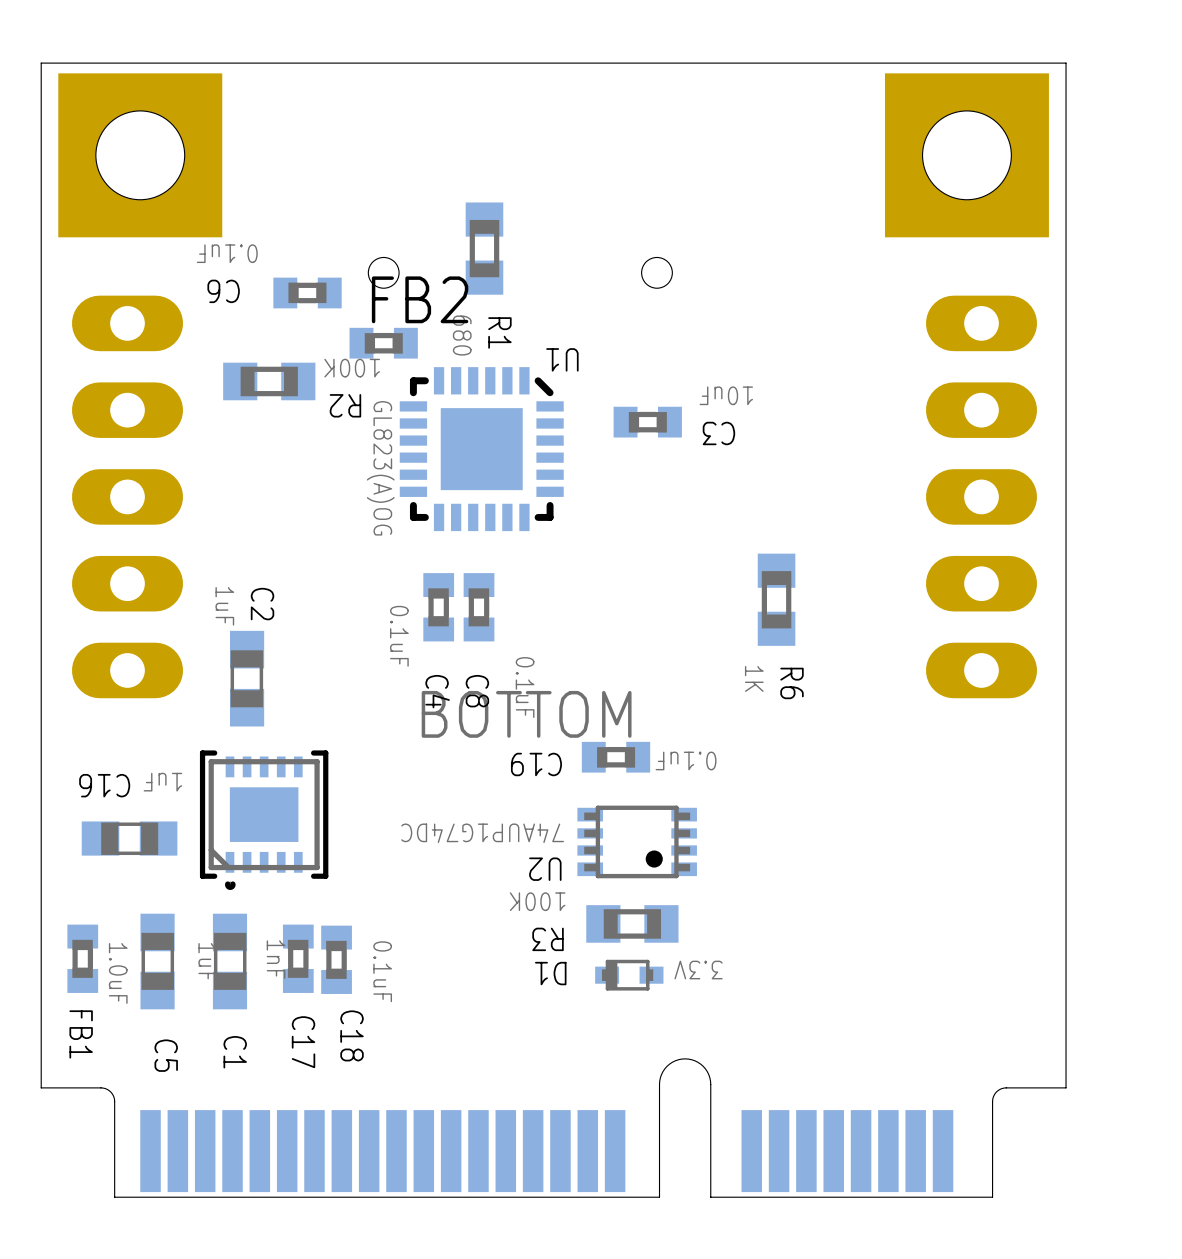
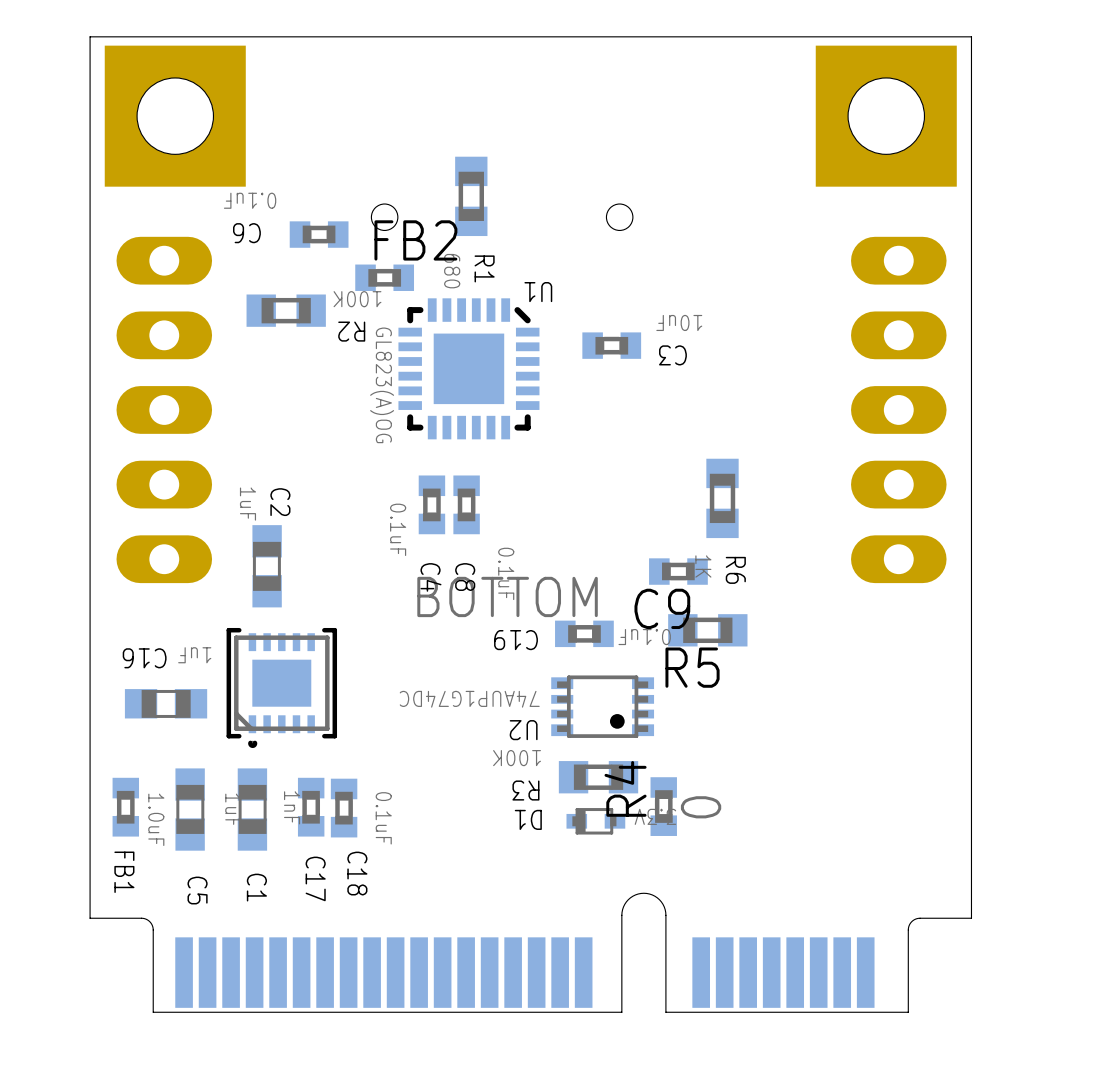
C9: none -> (678, 571)
R5: none -> (707, 630)
R4: none -> 0 (663, 806)

